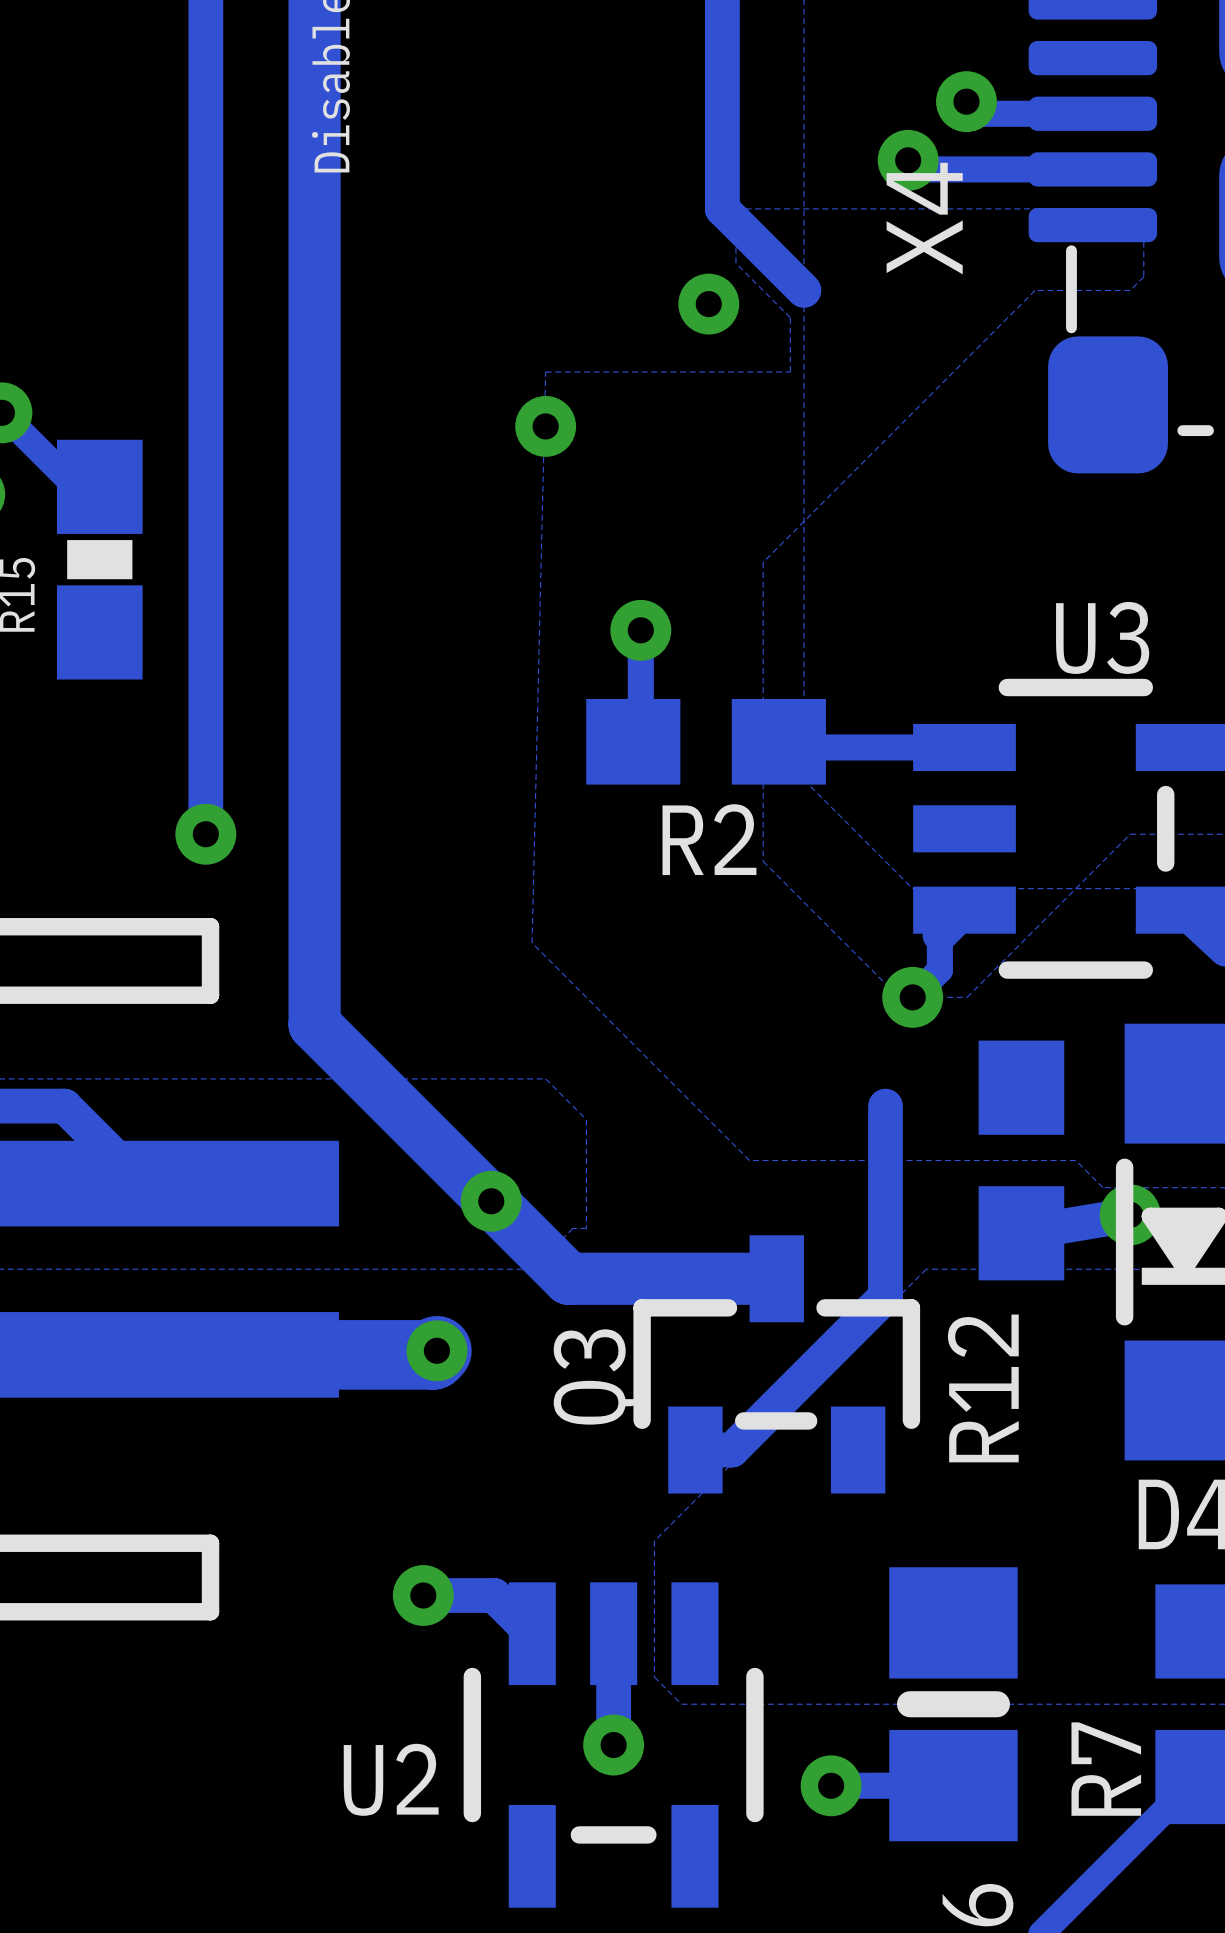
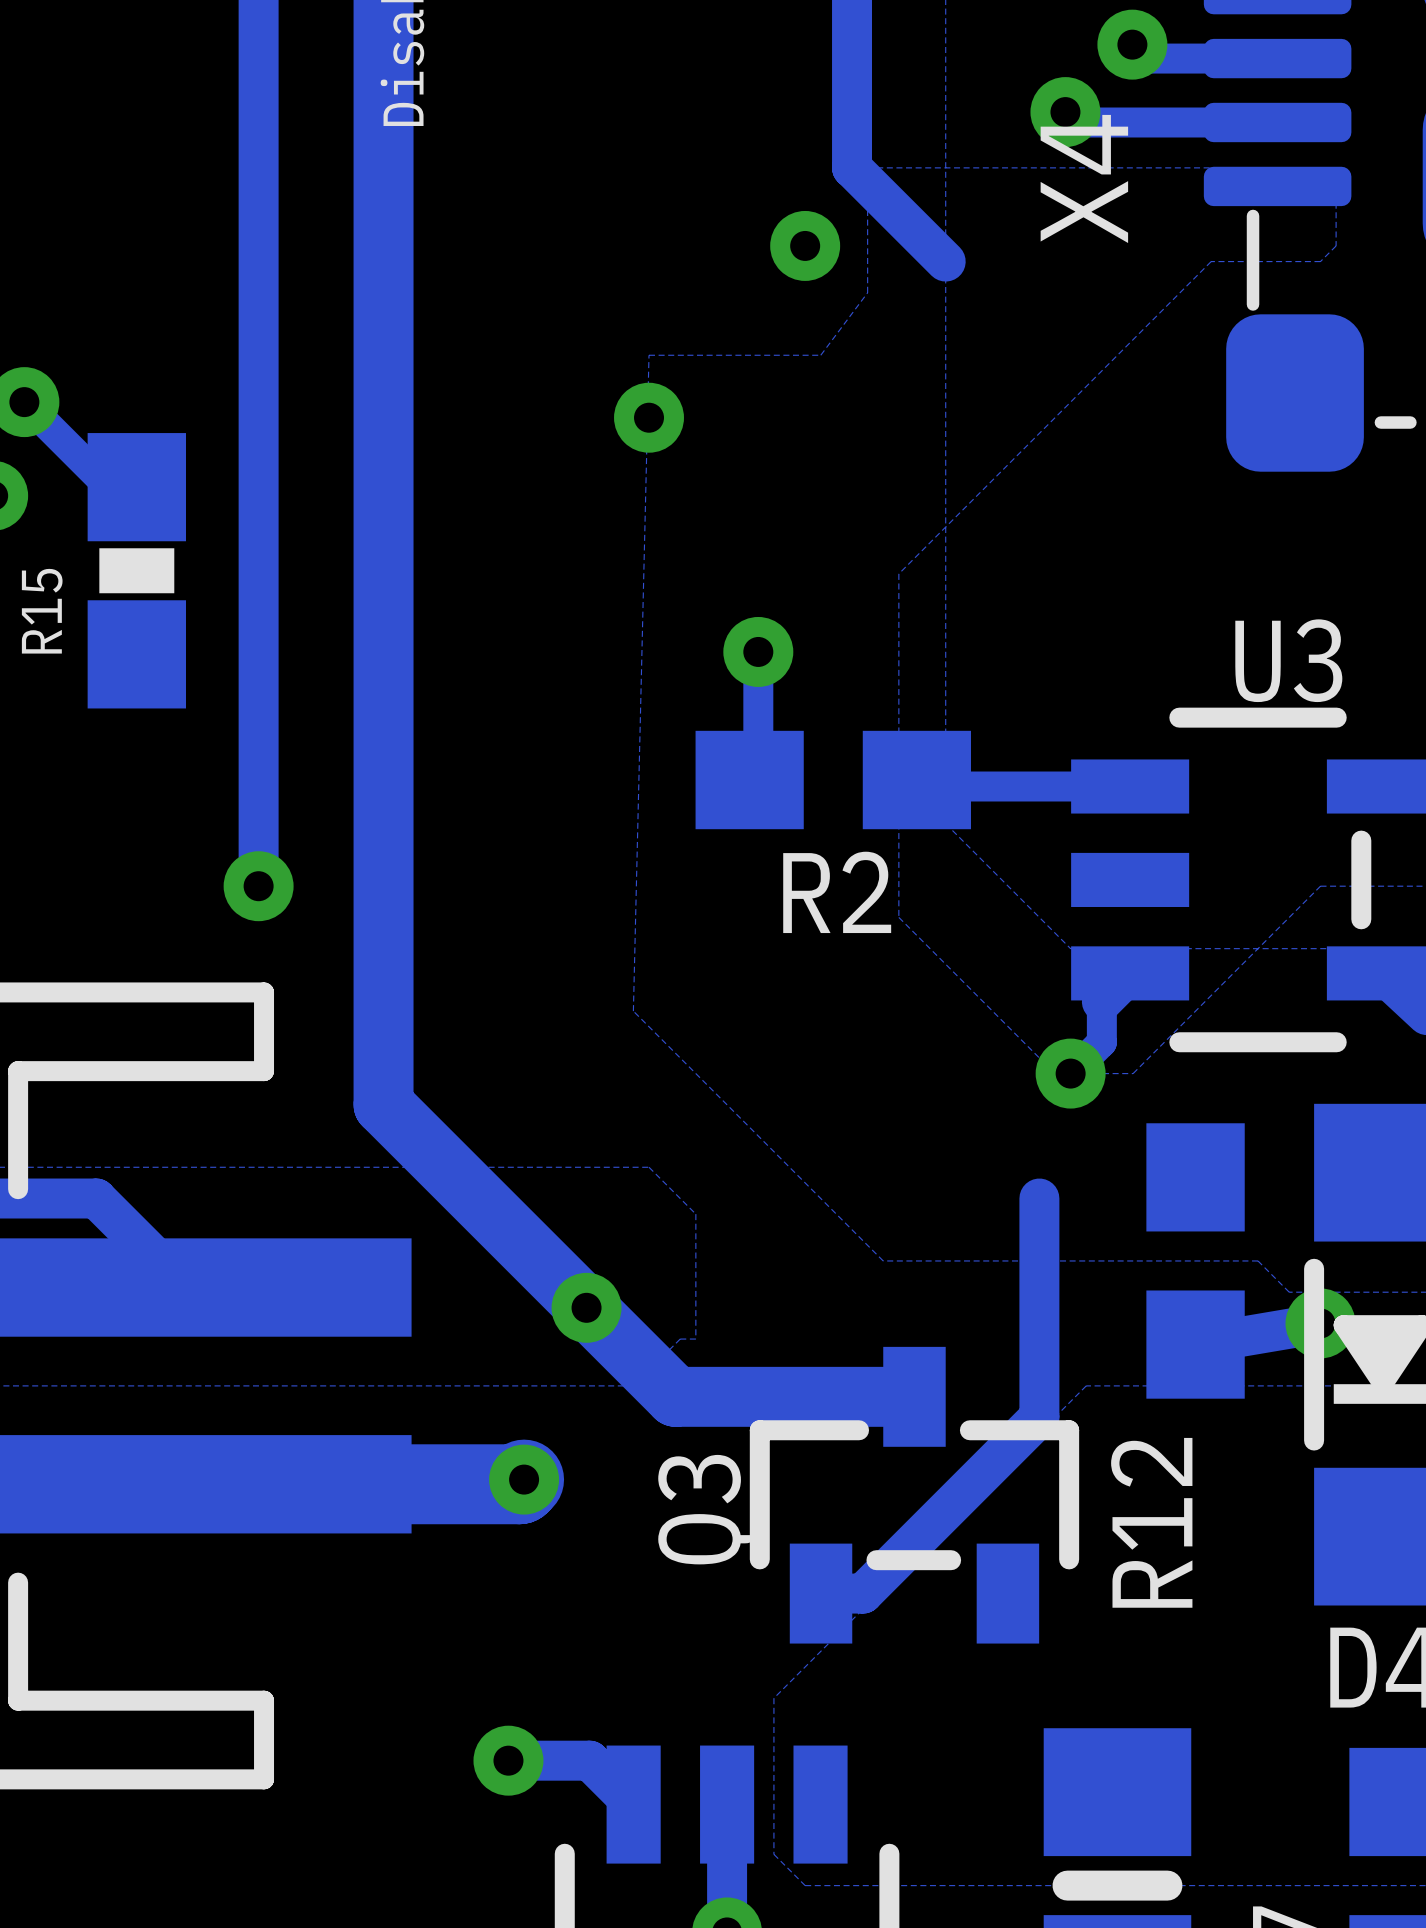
zone outline: (735, 263) (790, 317) (790, 372) (695, 372) -> (867, 230) (867, 292) (820, 355)
via position: (708, 304) -> (805, 245)

